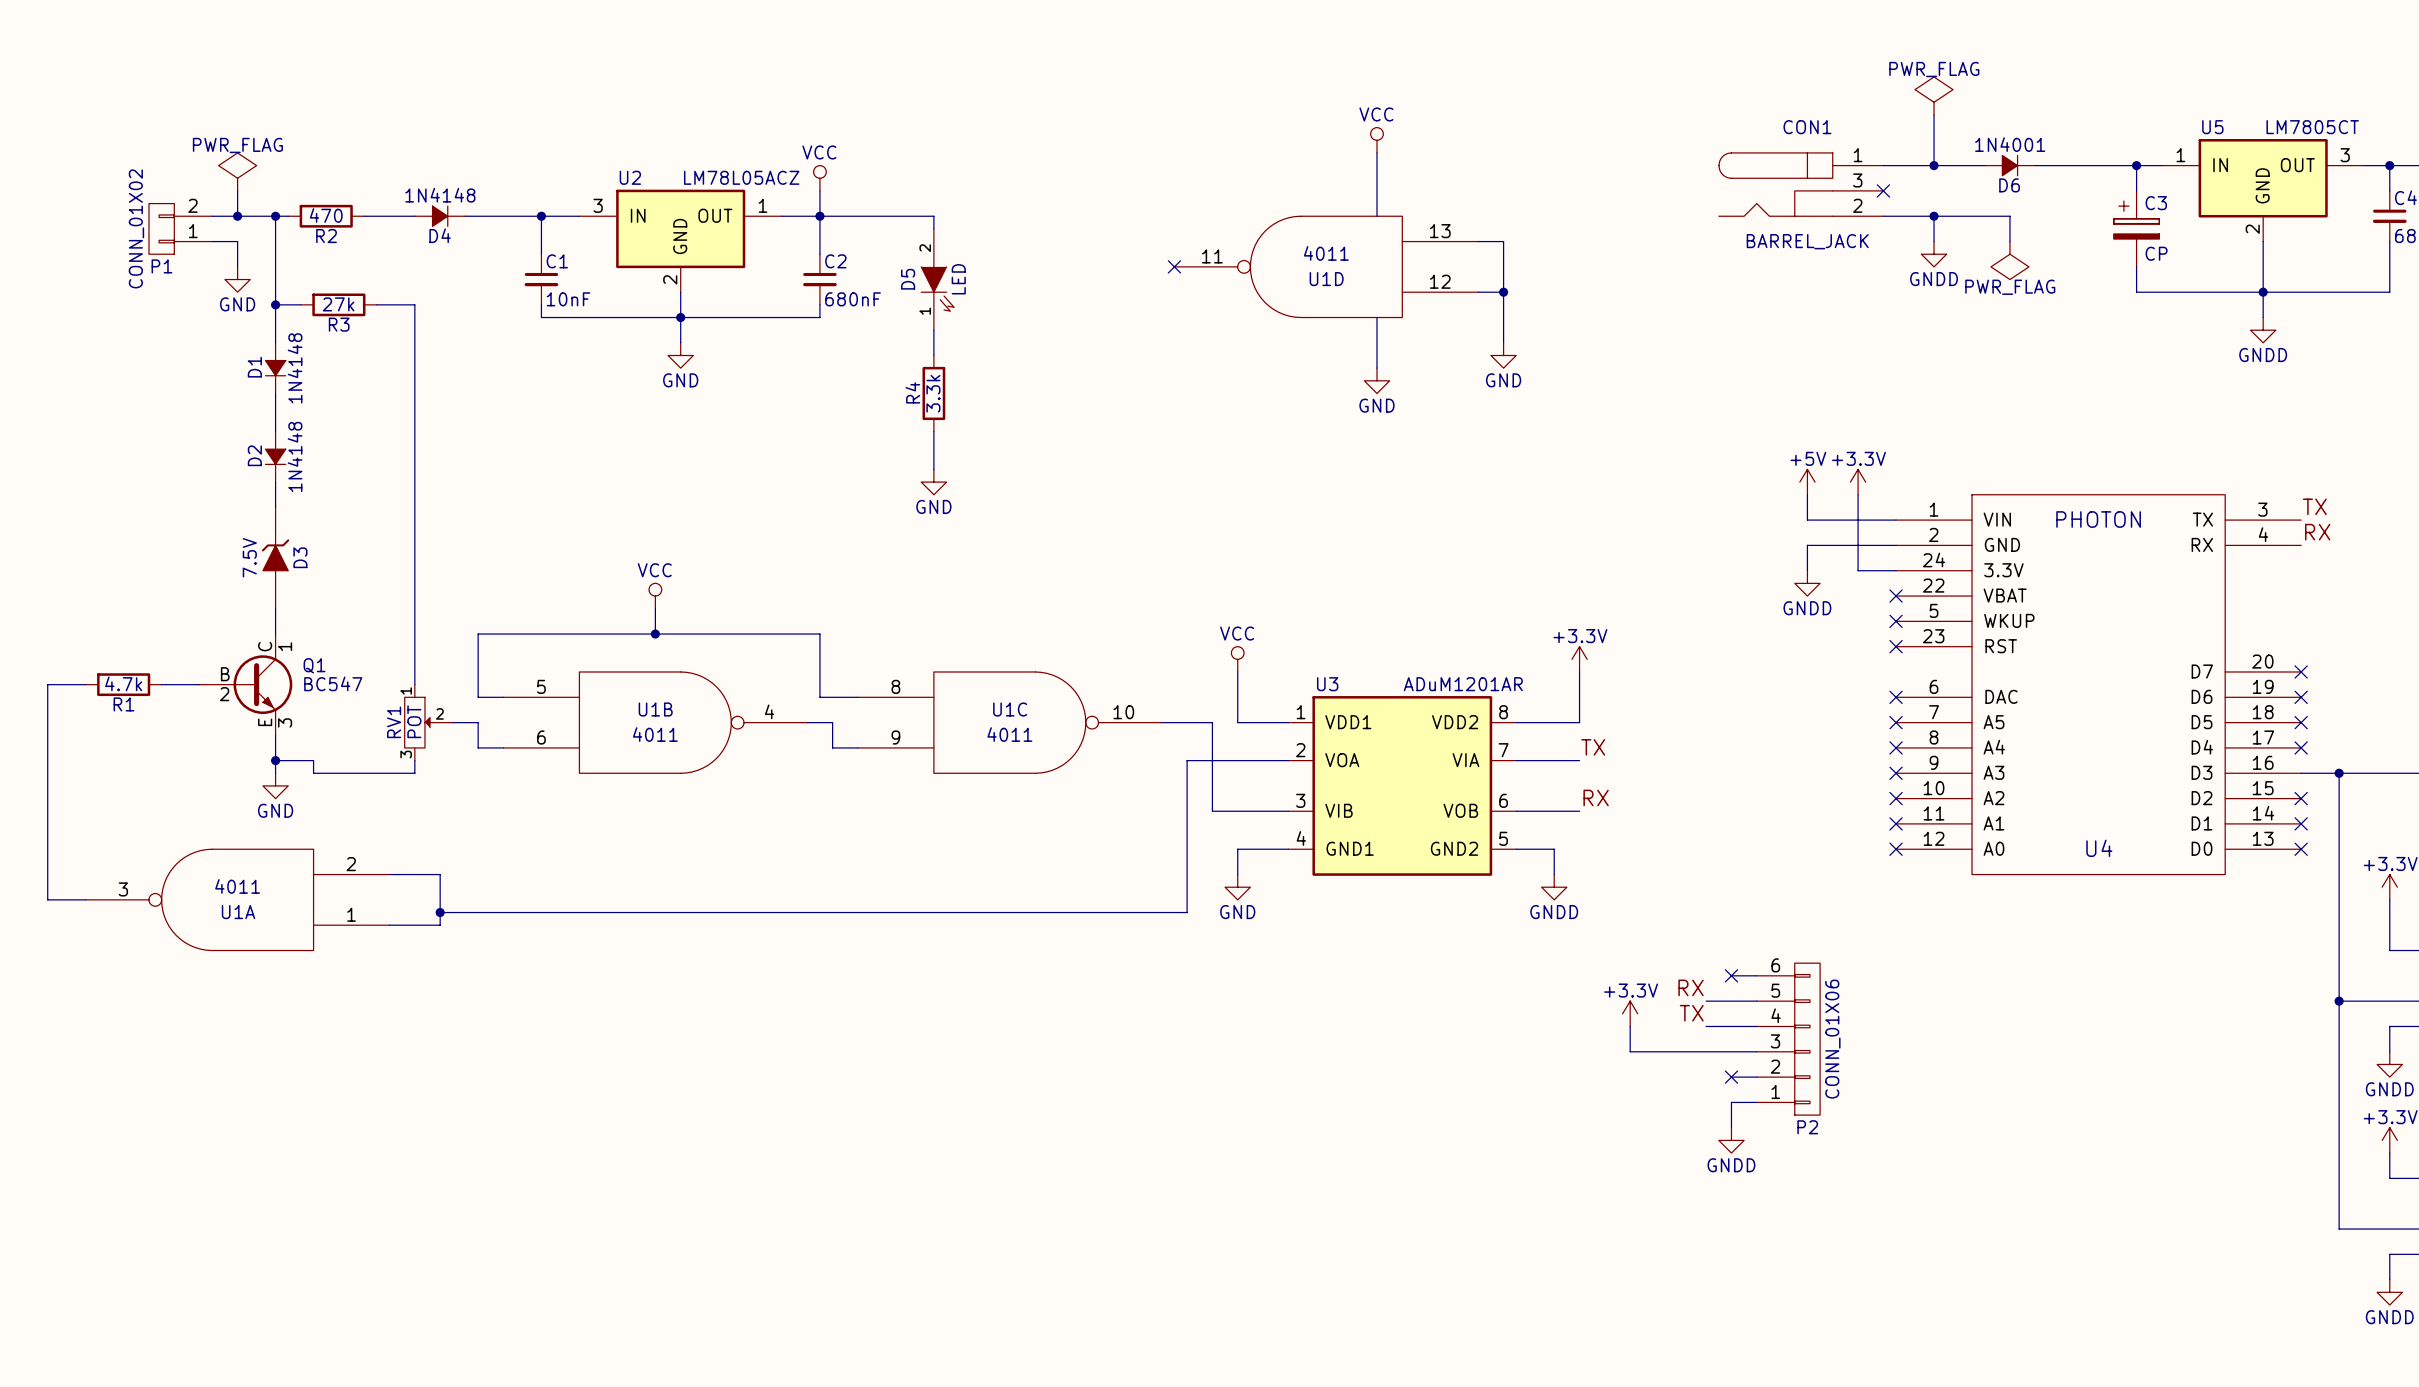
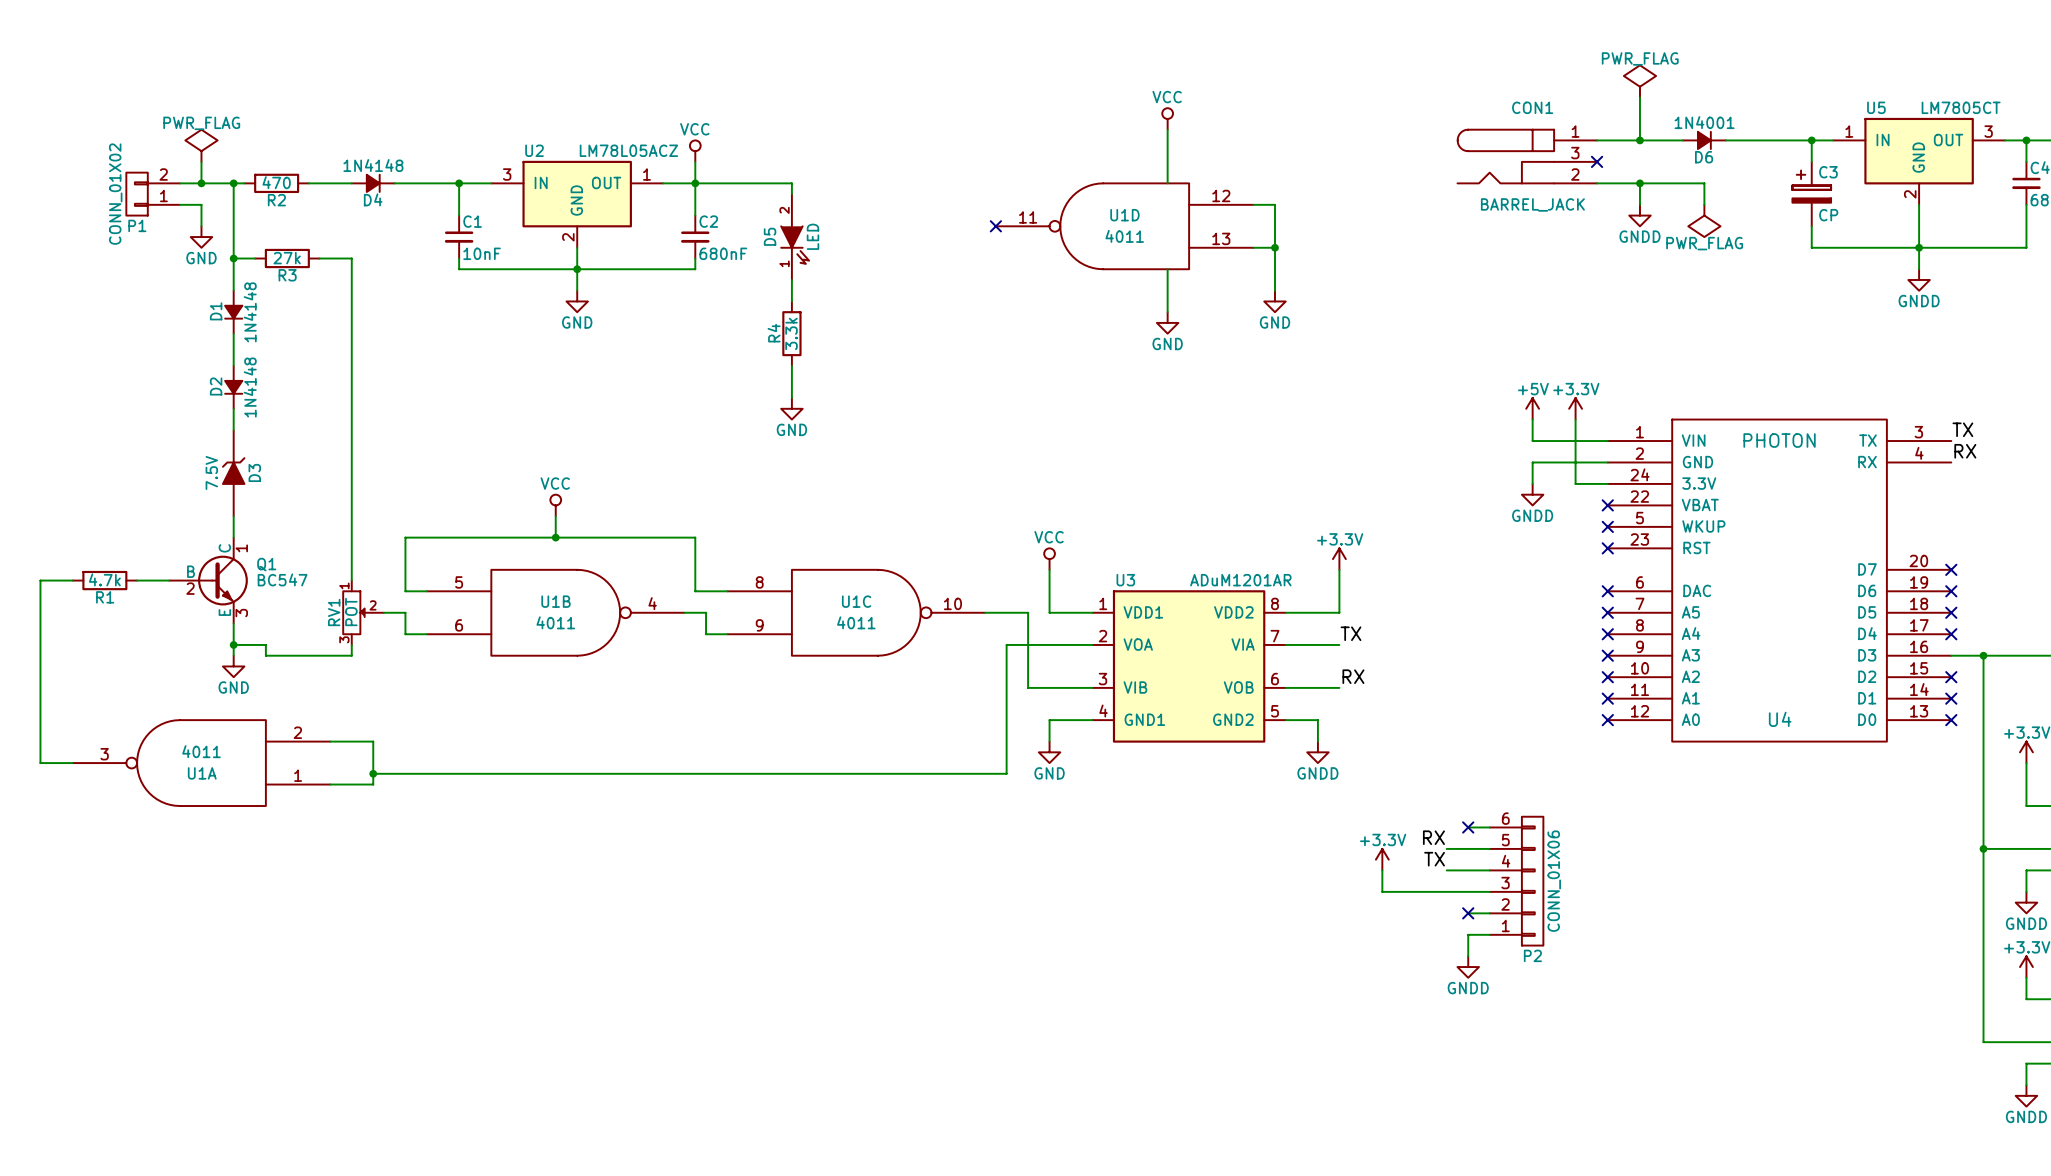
U1D flip: as is (1326, 266) -> up-down (1124, 226)

